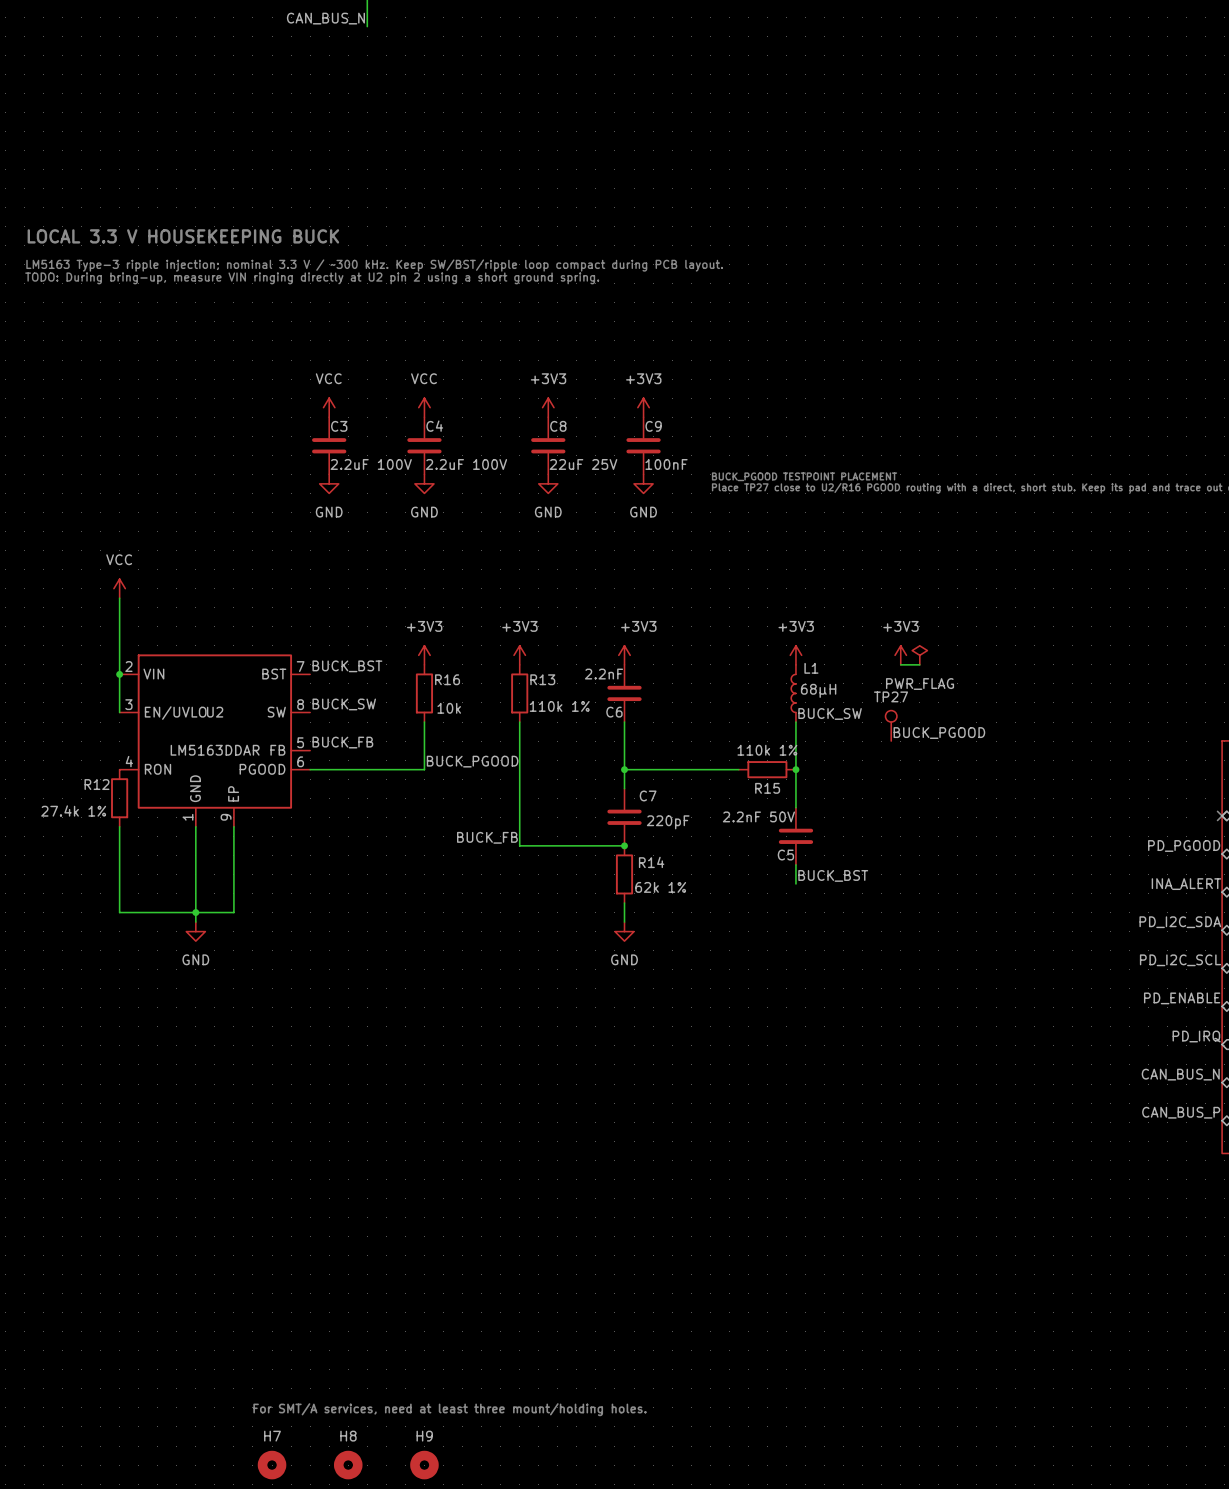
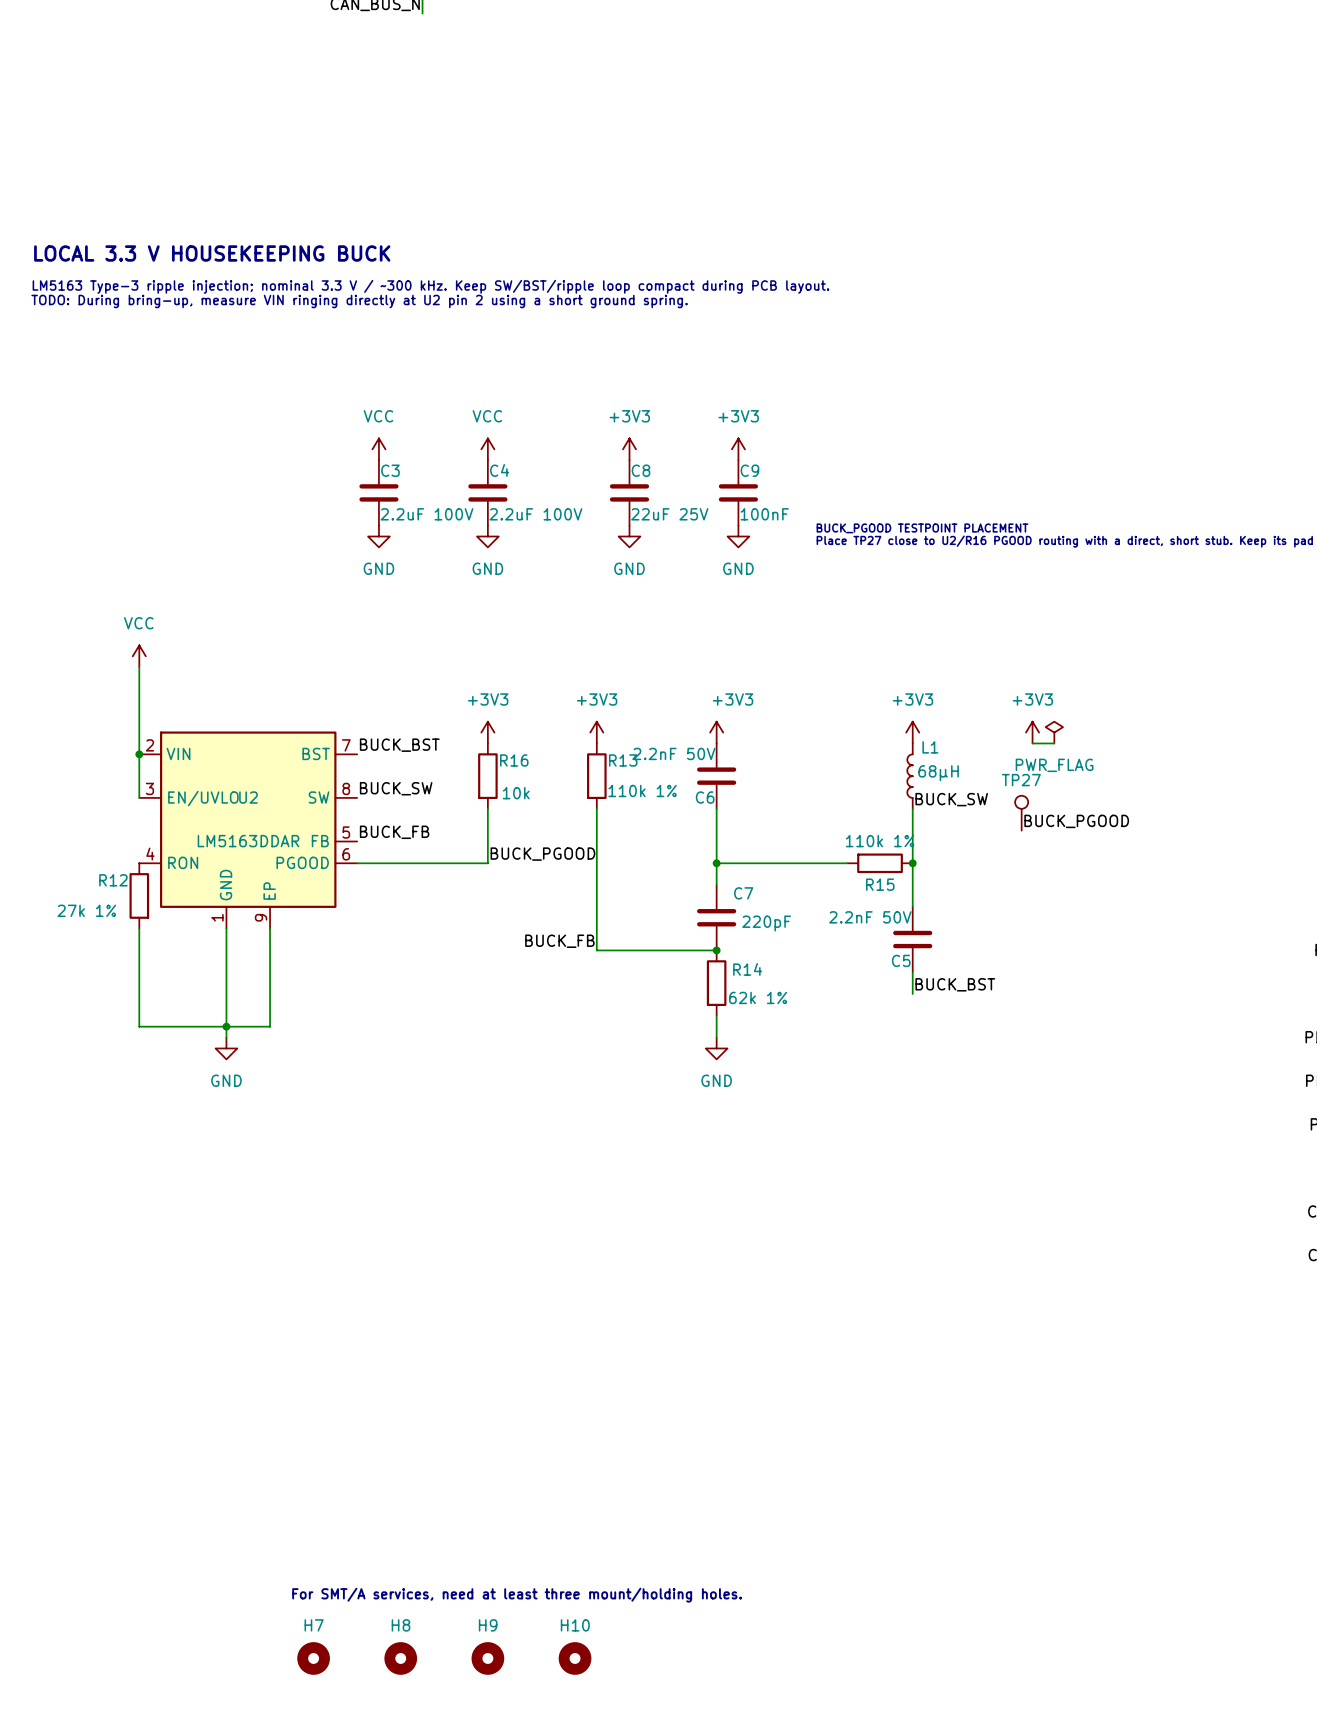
C6 value: 2.2nF (604, 674) -> 2.2nF 50V (674, 753)
R12 value: 27.4k 1% (73, 810) -> 27k 1% (86, 910)
H10: none -> (575, 1658)

